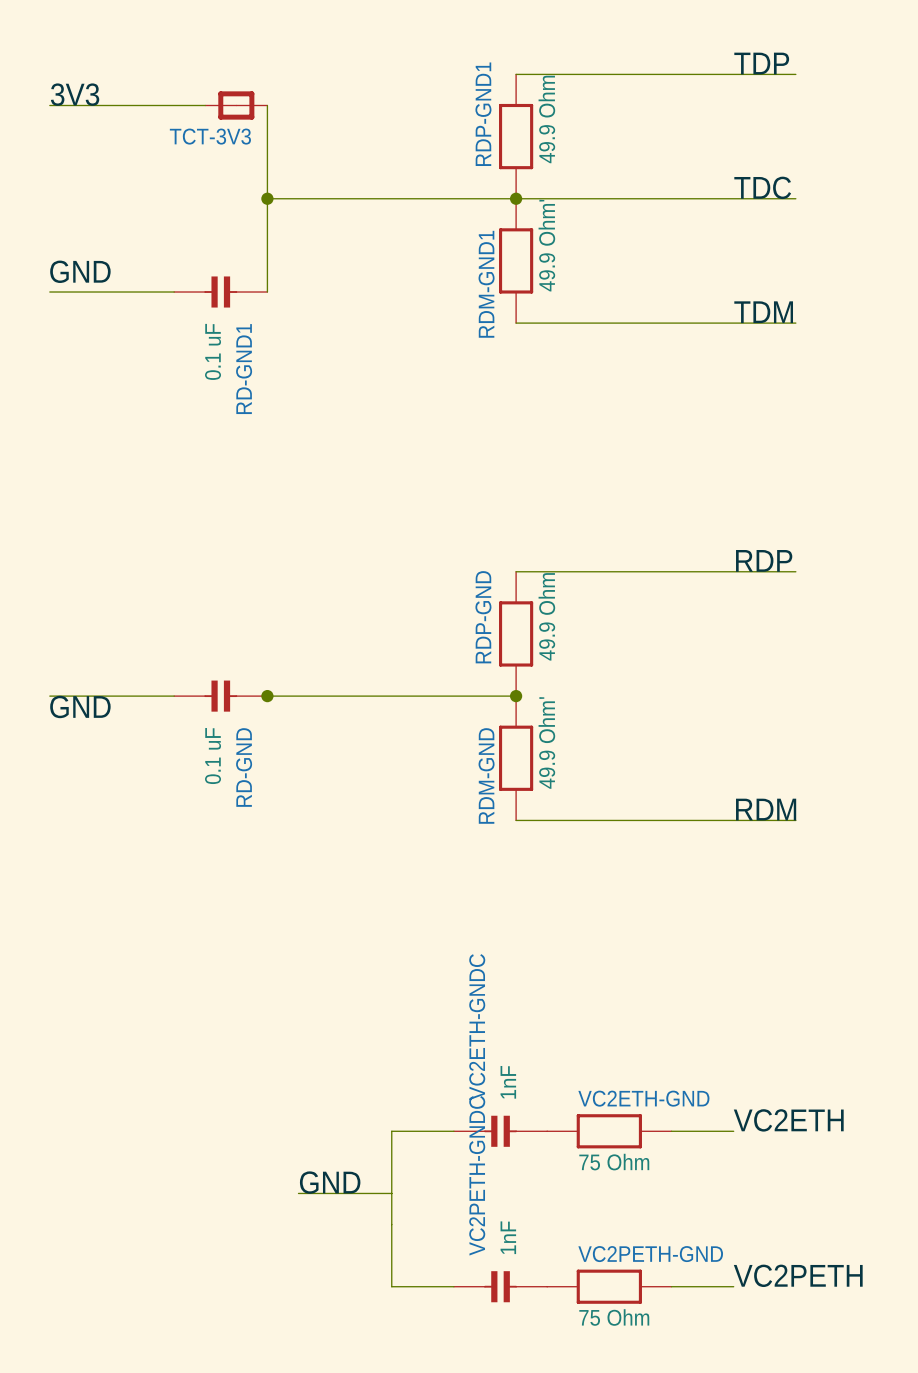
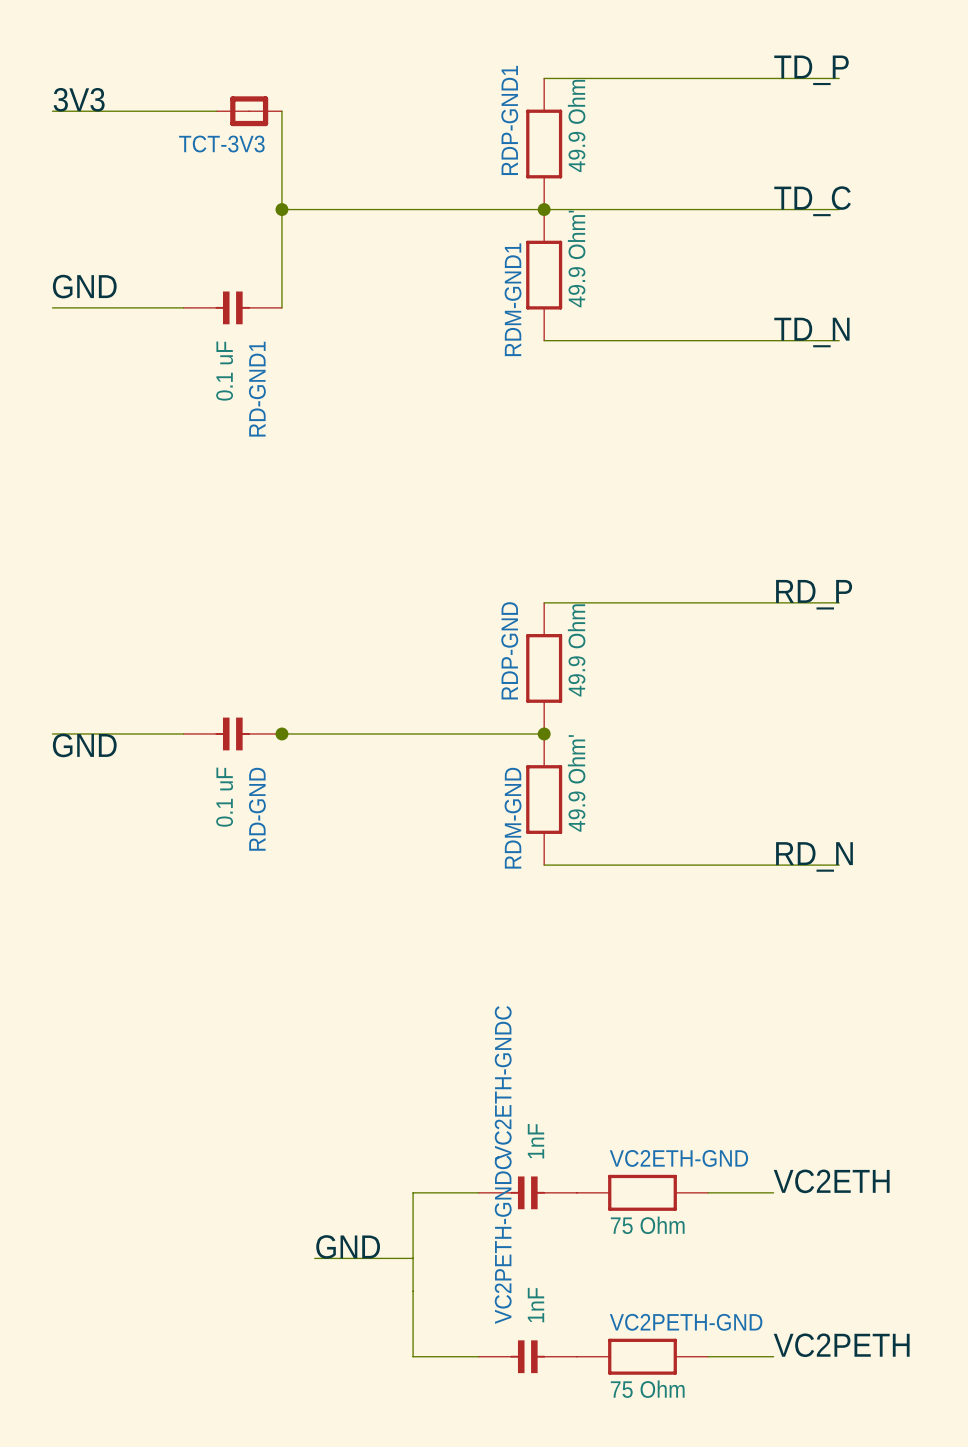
label: TDP (761, 63) -> TD_P (811, 70)
label: TDC (762, 187) -> TD_C (812, 201)
label: TDM (763, 312) -> TD_N (811, 332)
label: RDP (764, 560) -> RD_P (814, 594)
label: RDM (766, 809) -> RD_N (814, 856)

